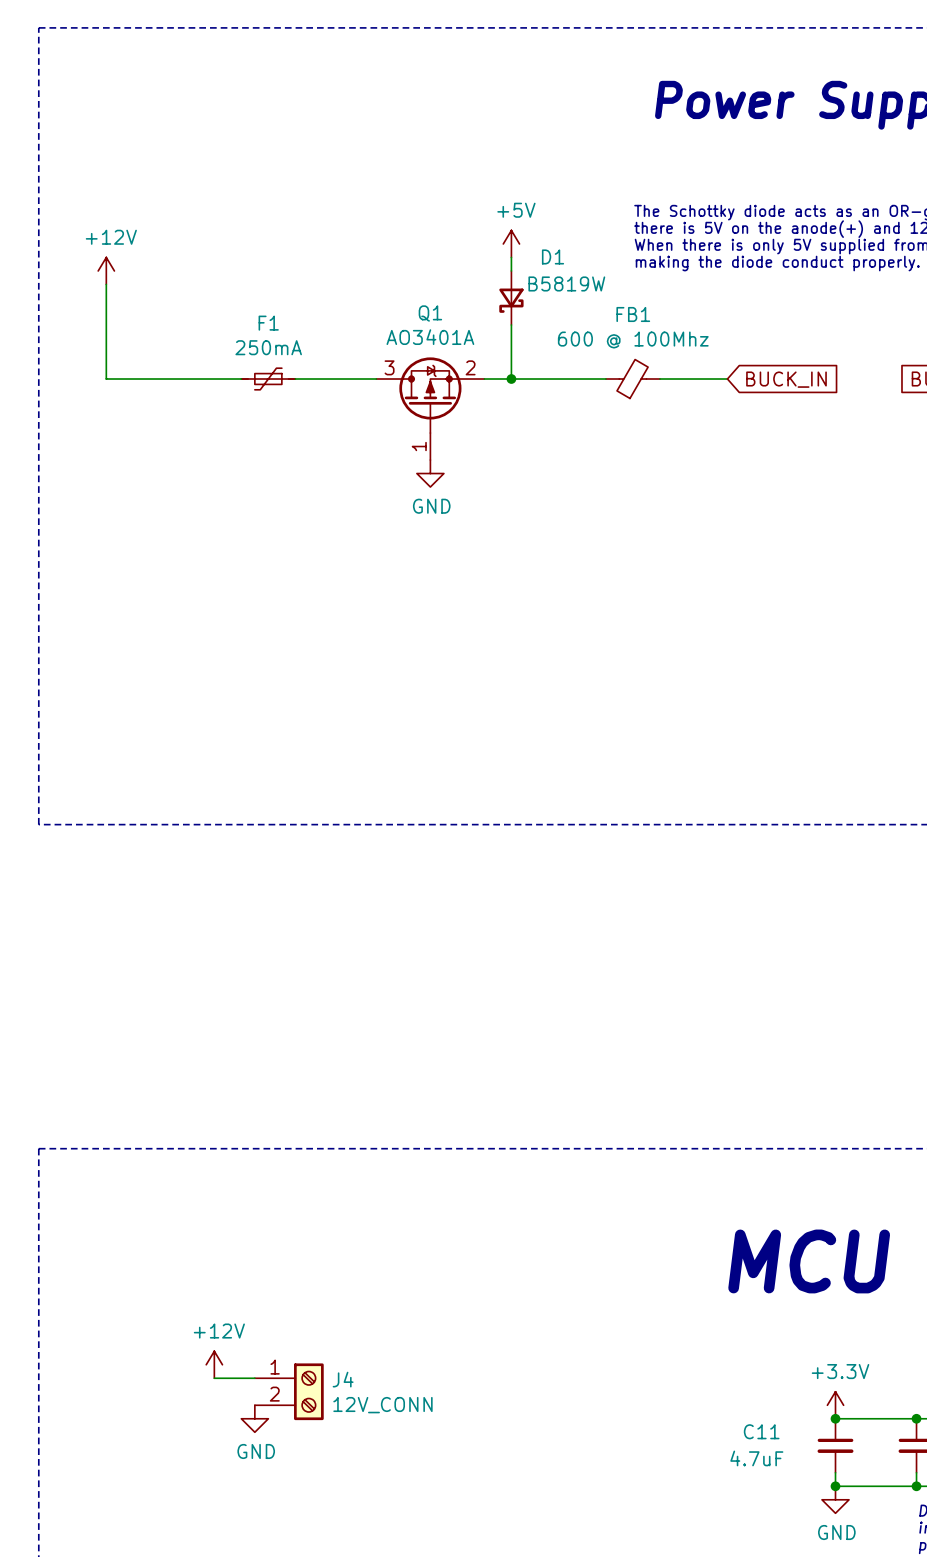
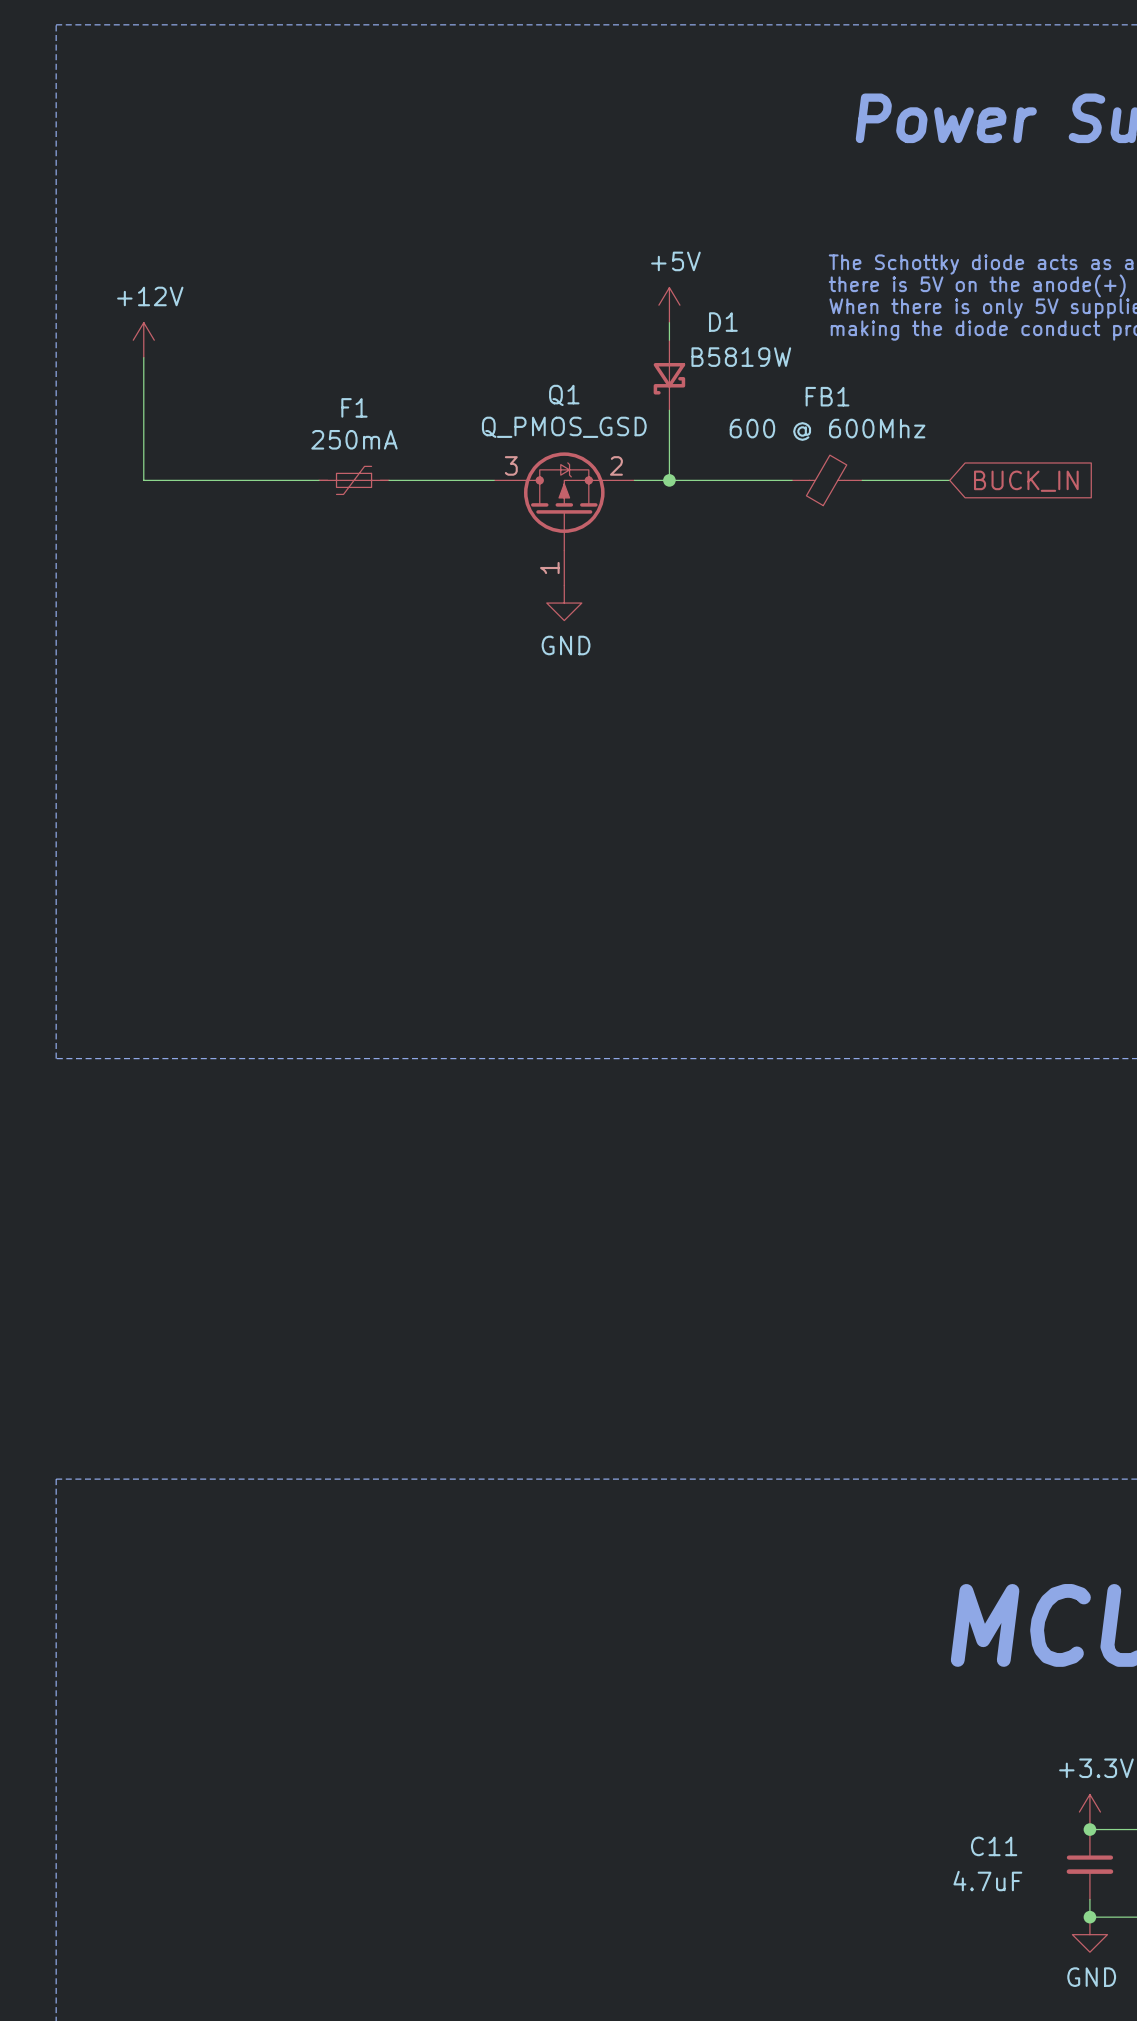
Q1 value: AO3401A (430, 337) -> Q_PMOS_GSD (564, 427)
FB1 value: 600 @ 100Mhz (633, 340) -> 600 @ 600Mhz (827, 429)
power symbol: +12V (214, 1364) -> none
wire: (214, 1378) (254, 1378) -> none
J4: 12V_CONN (289, 1391) -> none
power symbol: GND (254, 1418) -> none

